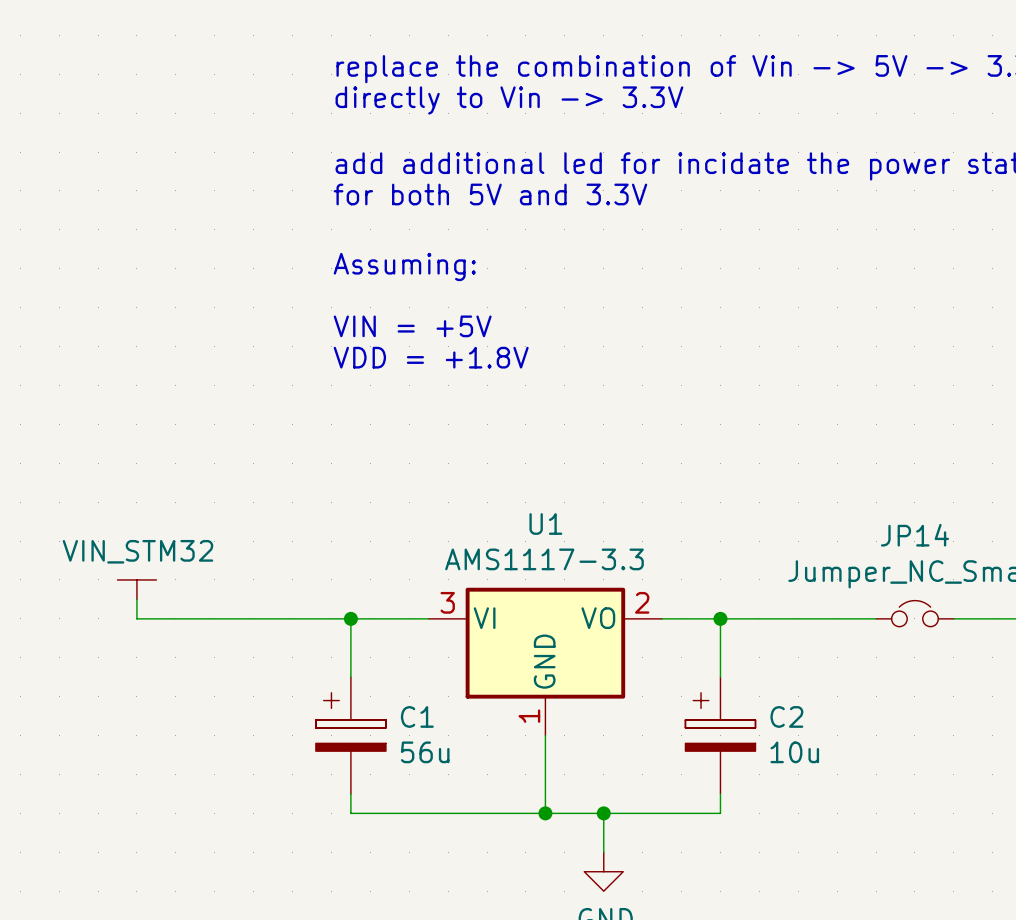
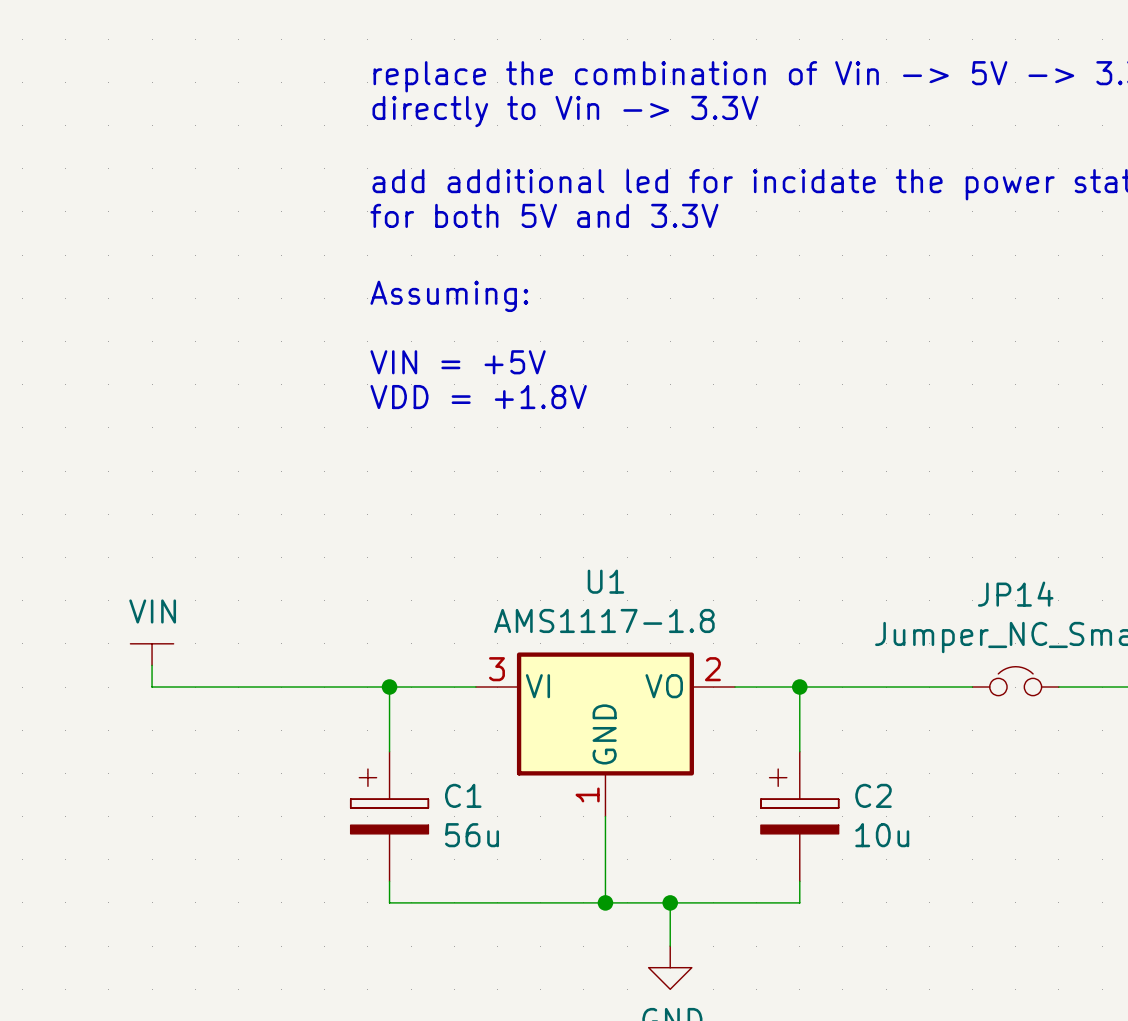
U1 value: AMS1117-3.3 (544, 559) -> AMS1117-1.8 (604, 620)
power symbol: VIN_STM32 (136, 589) -> VIN (152, 654)

